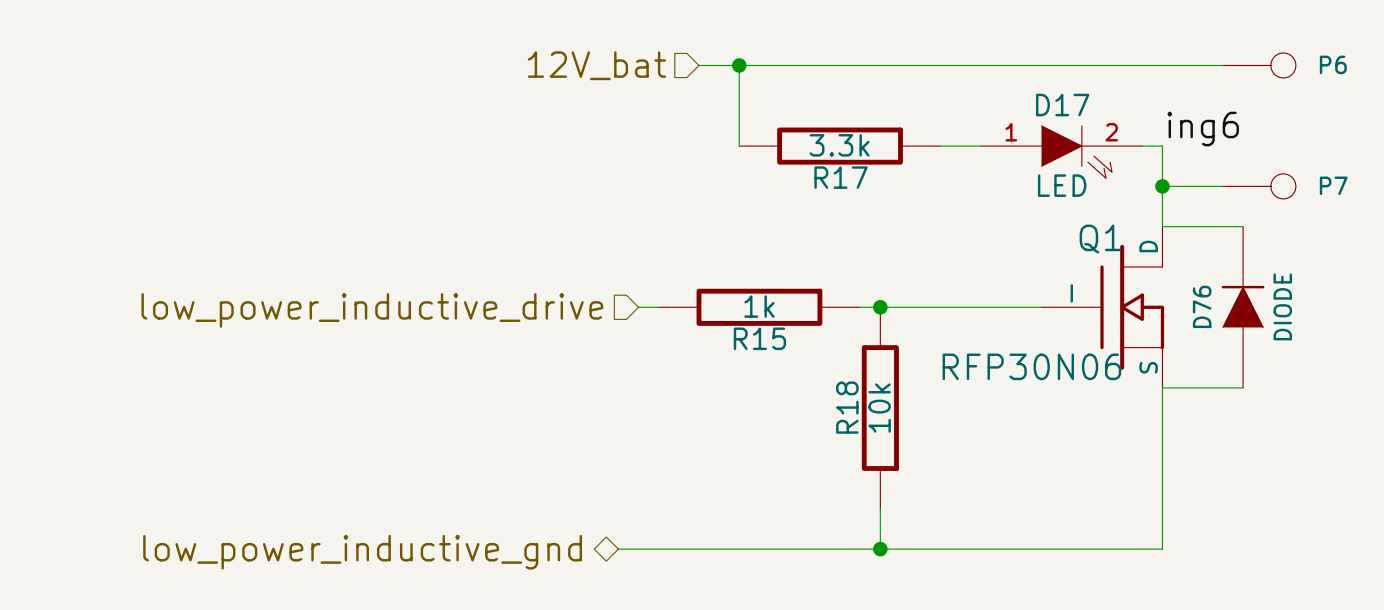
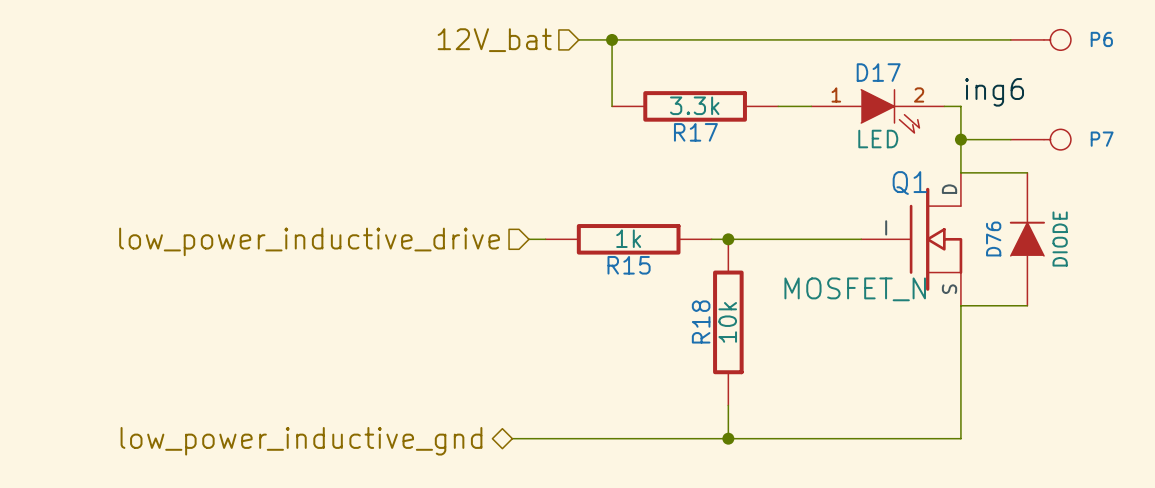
Q1 value: RFP30N06 (1031, 366) -> MOSFET_N (855, 289)

